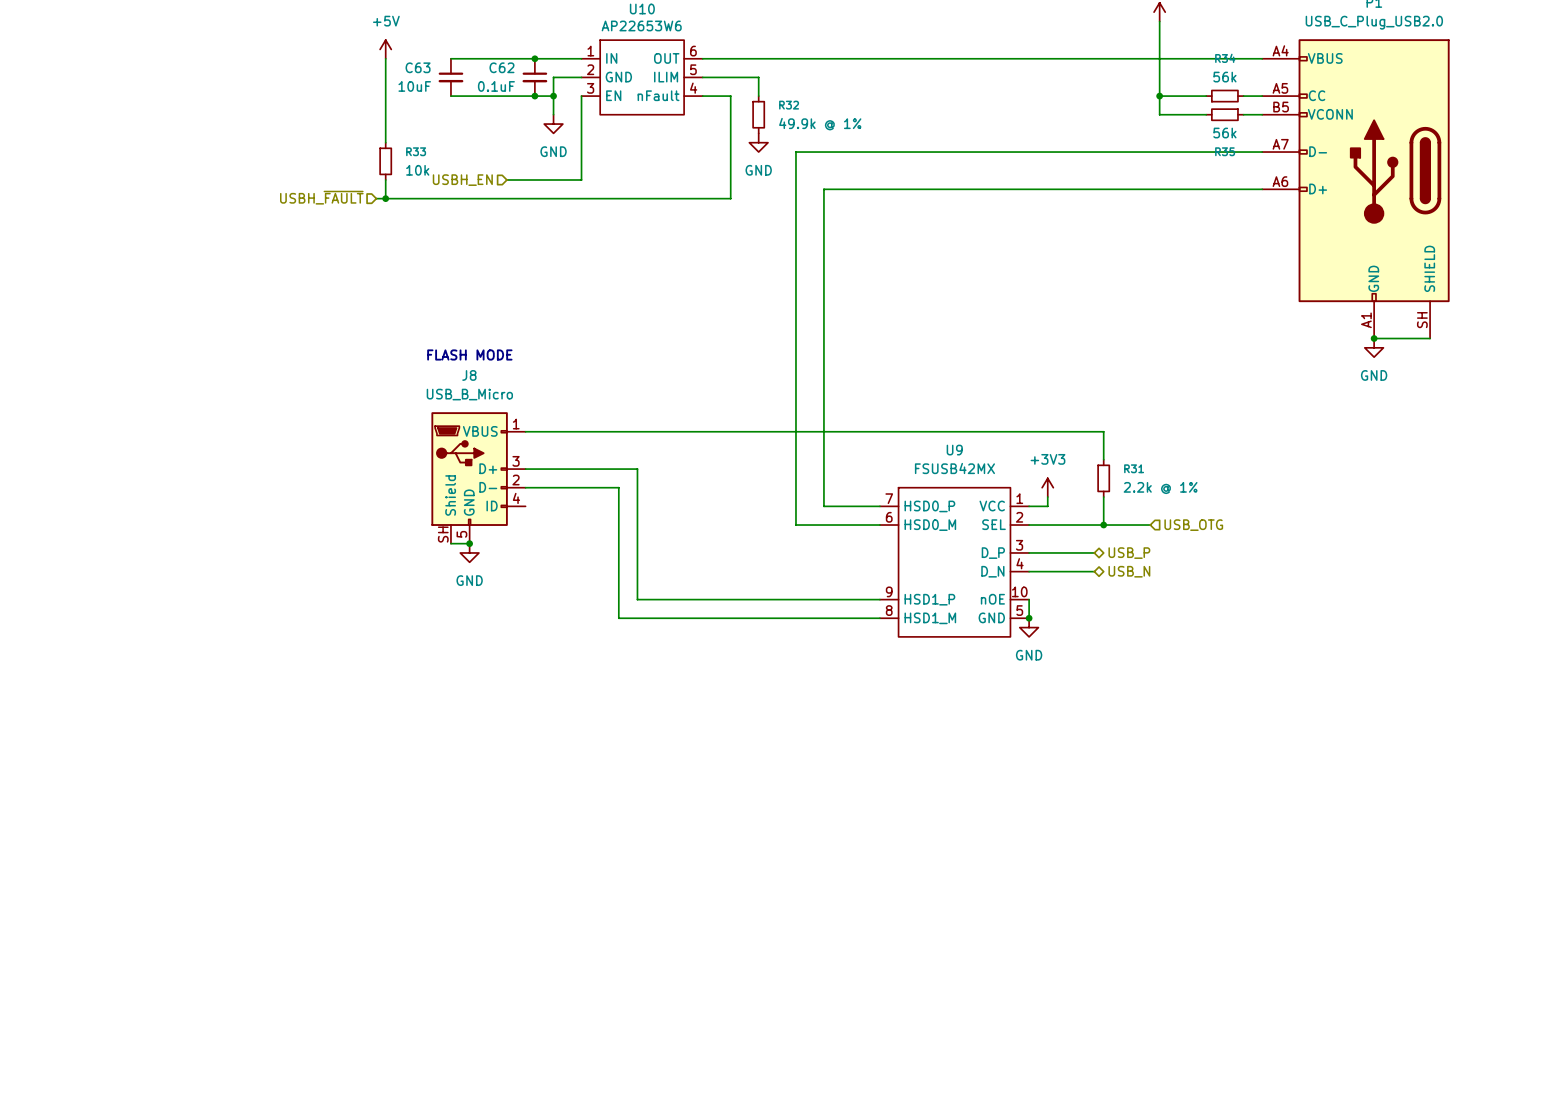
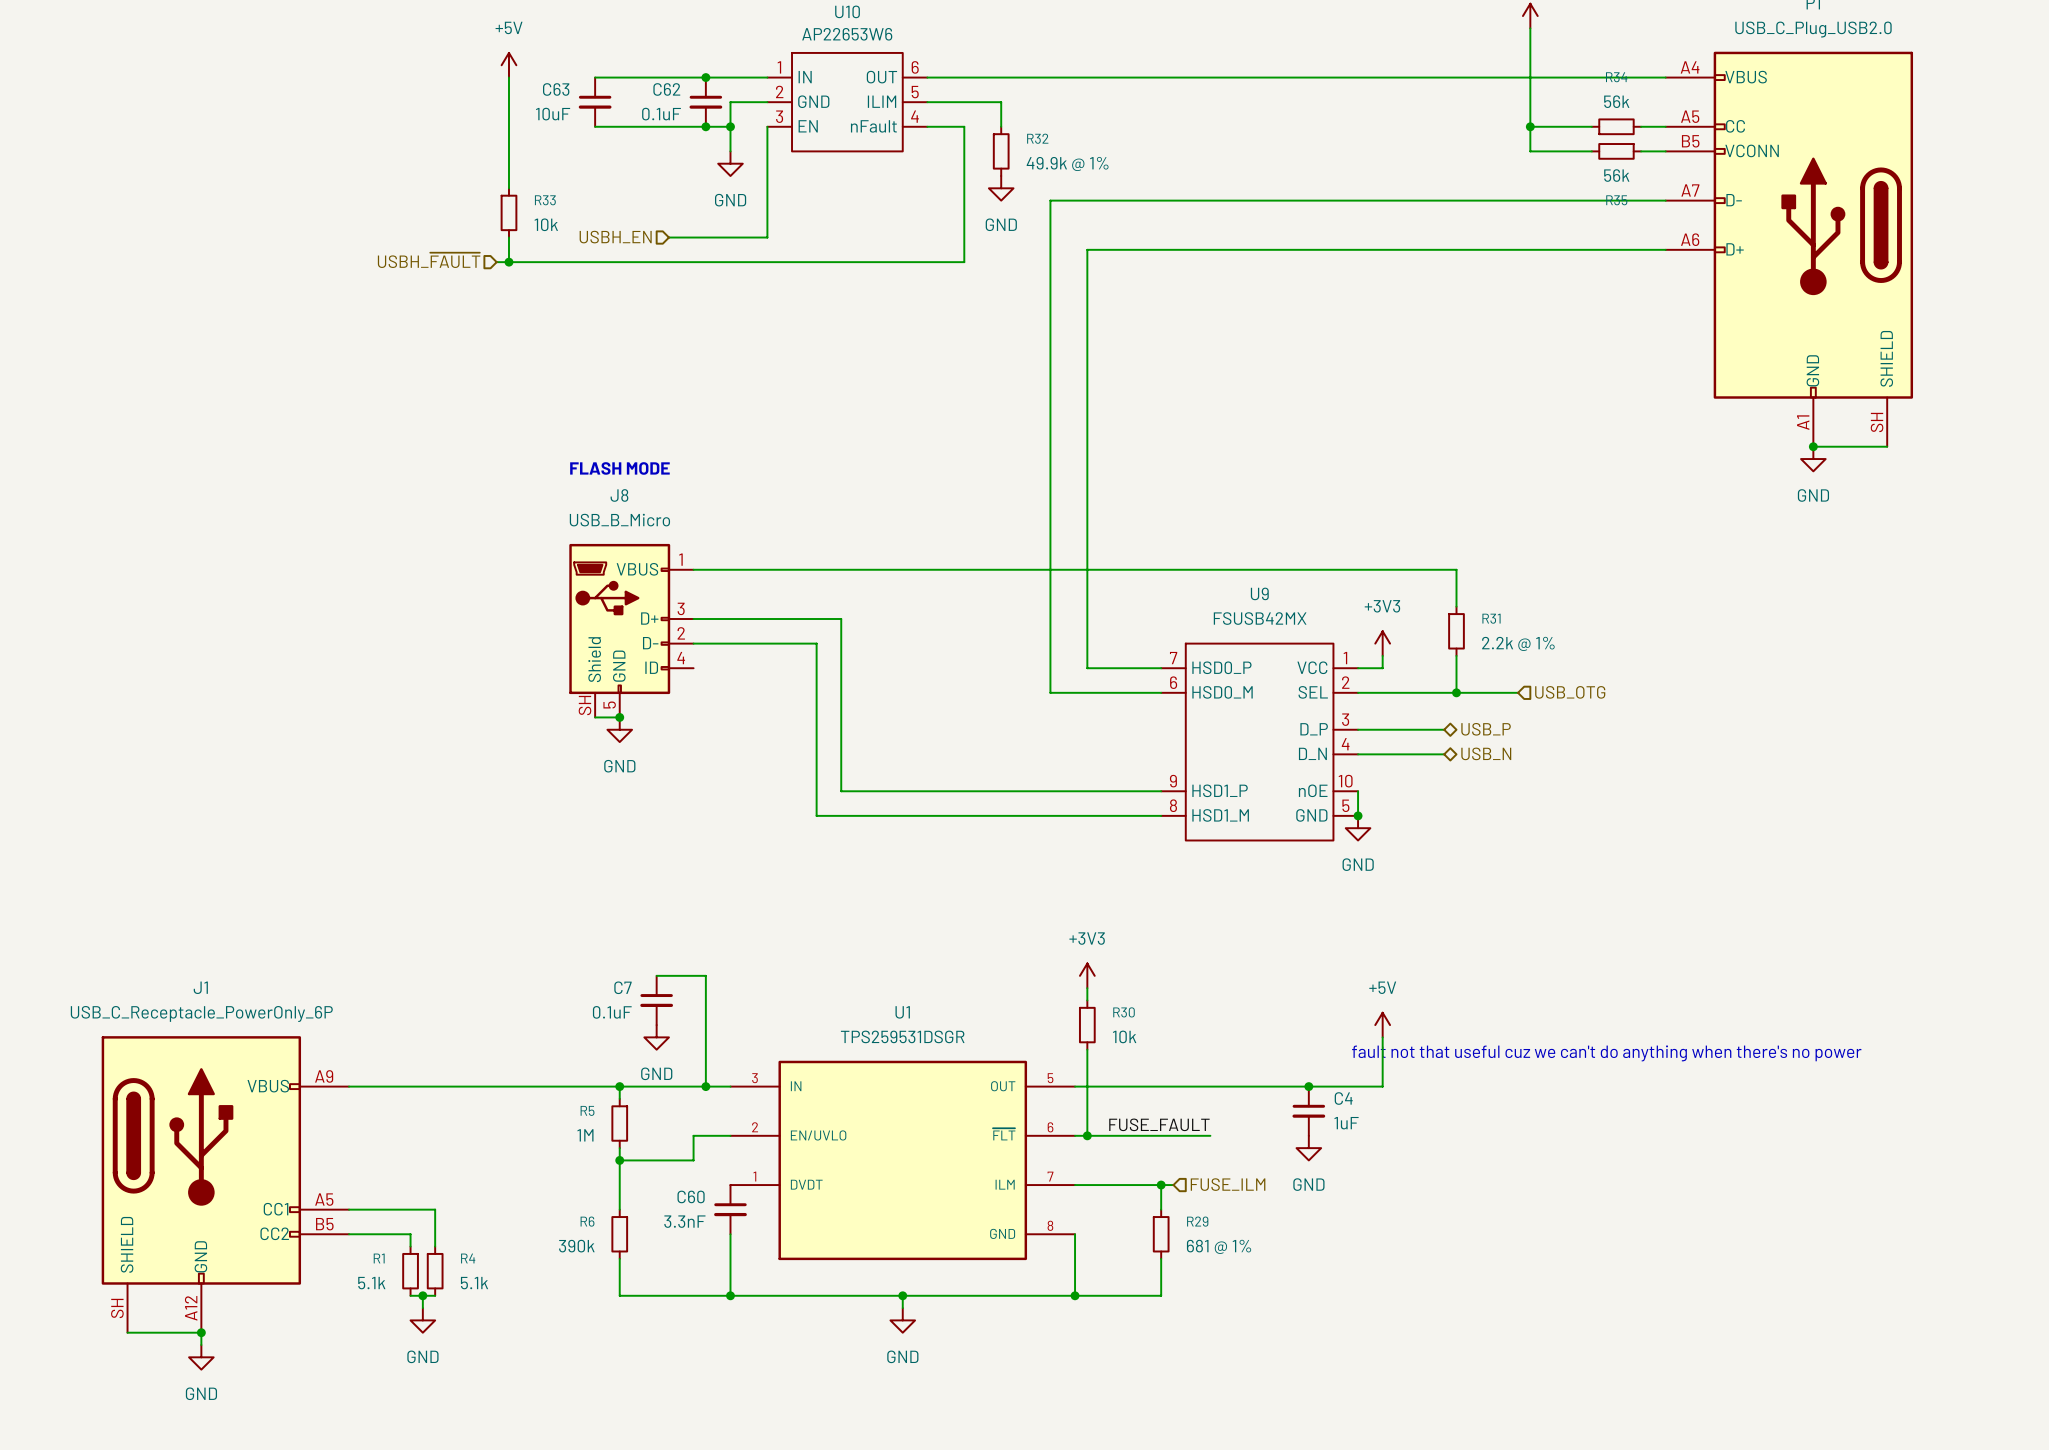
wire: none -> (656, 975) (705, 975) (705, 1086)
power symbol: none -> +3V3 (1087, 975)
wire: none -> (1087, 988) (1087, 1000)
C7: none -> 0.1uF (656, 1000)
R30: none -> 10k (1087, 1025)
power symbol: none -> +5V (1382, 1025)
power symbol: none -> GND (656, 1037)
wire: none -> (1382, 1037) (1382, 1086) (1075, 1086)
wire: none -> (1087, 1049) (1087, 1135)
text: none -> fault not that useful cuz we can't do anything when there's no power (1606, 1053)
wire: none -> (349, 1086) (730, 1086)
wire: none -> (619, 1086) (619, 1098)
junction: none -> (619, 1086)
junction: none -> (705, 1086)
junction: none -> (1308, 1086)
C4: none -> 1uF (1308, 1111)
R5: none -> 1M (619, 1123)
label: none -> FUSE_FAULT (1159, 1124)
wire: none -> (730, 1135) (693, 1135) (693, 1160) (619, 1160)
wire: none -> (1075, 1135) (1210, 1135)
junction: none -> (1087, 1135)
wire: none -> (619, 1148) (619, 1209)
power symbol: none -> GND (1308, 1148)
junction: none -> (619, 1160)
U1: none -> TPS259531DSGR (902, 1160)
J1: none -> USB_C_Receptacle_PowerOnly_6P (225, 1184)
wire: none -> (1075, 1185) (1173, 1185)
wire: none -> (1161, 1185) (1161, 1209)
junction: none -> (1161, 1185)
hierarchical label: none -> FUSE_ILM (1228, 1184)
wire: none -> (349, 1209) (435, 1209) (435, 1246)
C60: none -> 3.3nF (730, 1209)
wire: none -> (349, 1234) (410, 1234) (410, 1246)
R6: none -> 390k (619, 1234)
wire: none -> (730, 1234) (730, 1295)
wire: none -> (1075, 1234) (1075, 1295)
R29: none -> 681 @ 1% (1161, 1234)
wire: none -> (619, 1258) (619, 1295) (1161, 1295) (1161, 1258)
R1: none -> 5.1k (410, 1271)
R4: none -> 5.1k (435, 1271)
wire: none -> (410, 1295) (435, 1295)
wire: none -> (422, 1295) (422, 1308)
junction: none -> (422, 1295)
junction: none -> (730, 1295)
wire: none -> (902, 1295) (902, 1308)
junction: none -> (902, 1295)
junction: none -> (1075, 1295)
power symbol: none -> GND (422, 1320)
power symbol: none -> GND (902, 1320)
wire: none -> (127, 1332) (201, 1332) (201, 1345)
junction: none -> (201, 1332)
power symbol: none -> GND (201, 1357)

